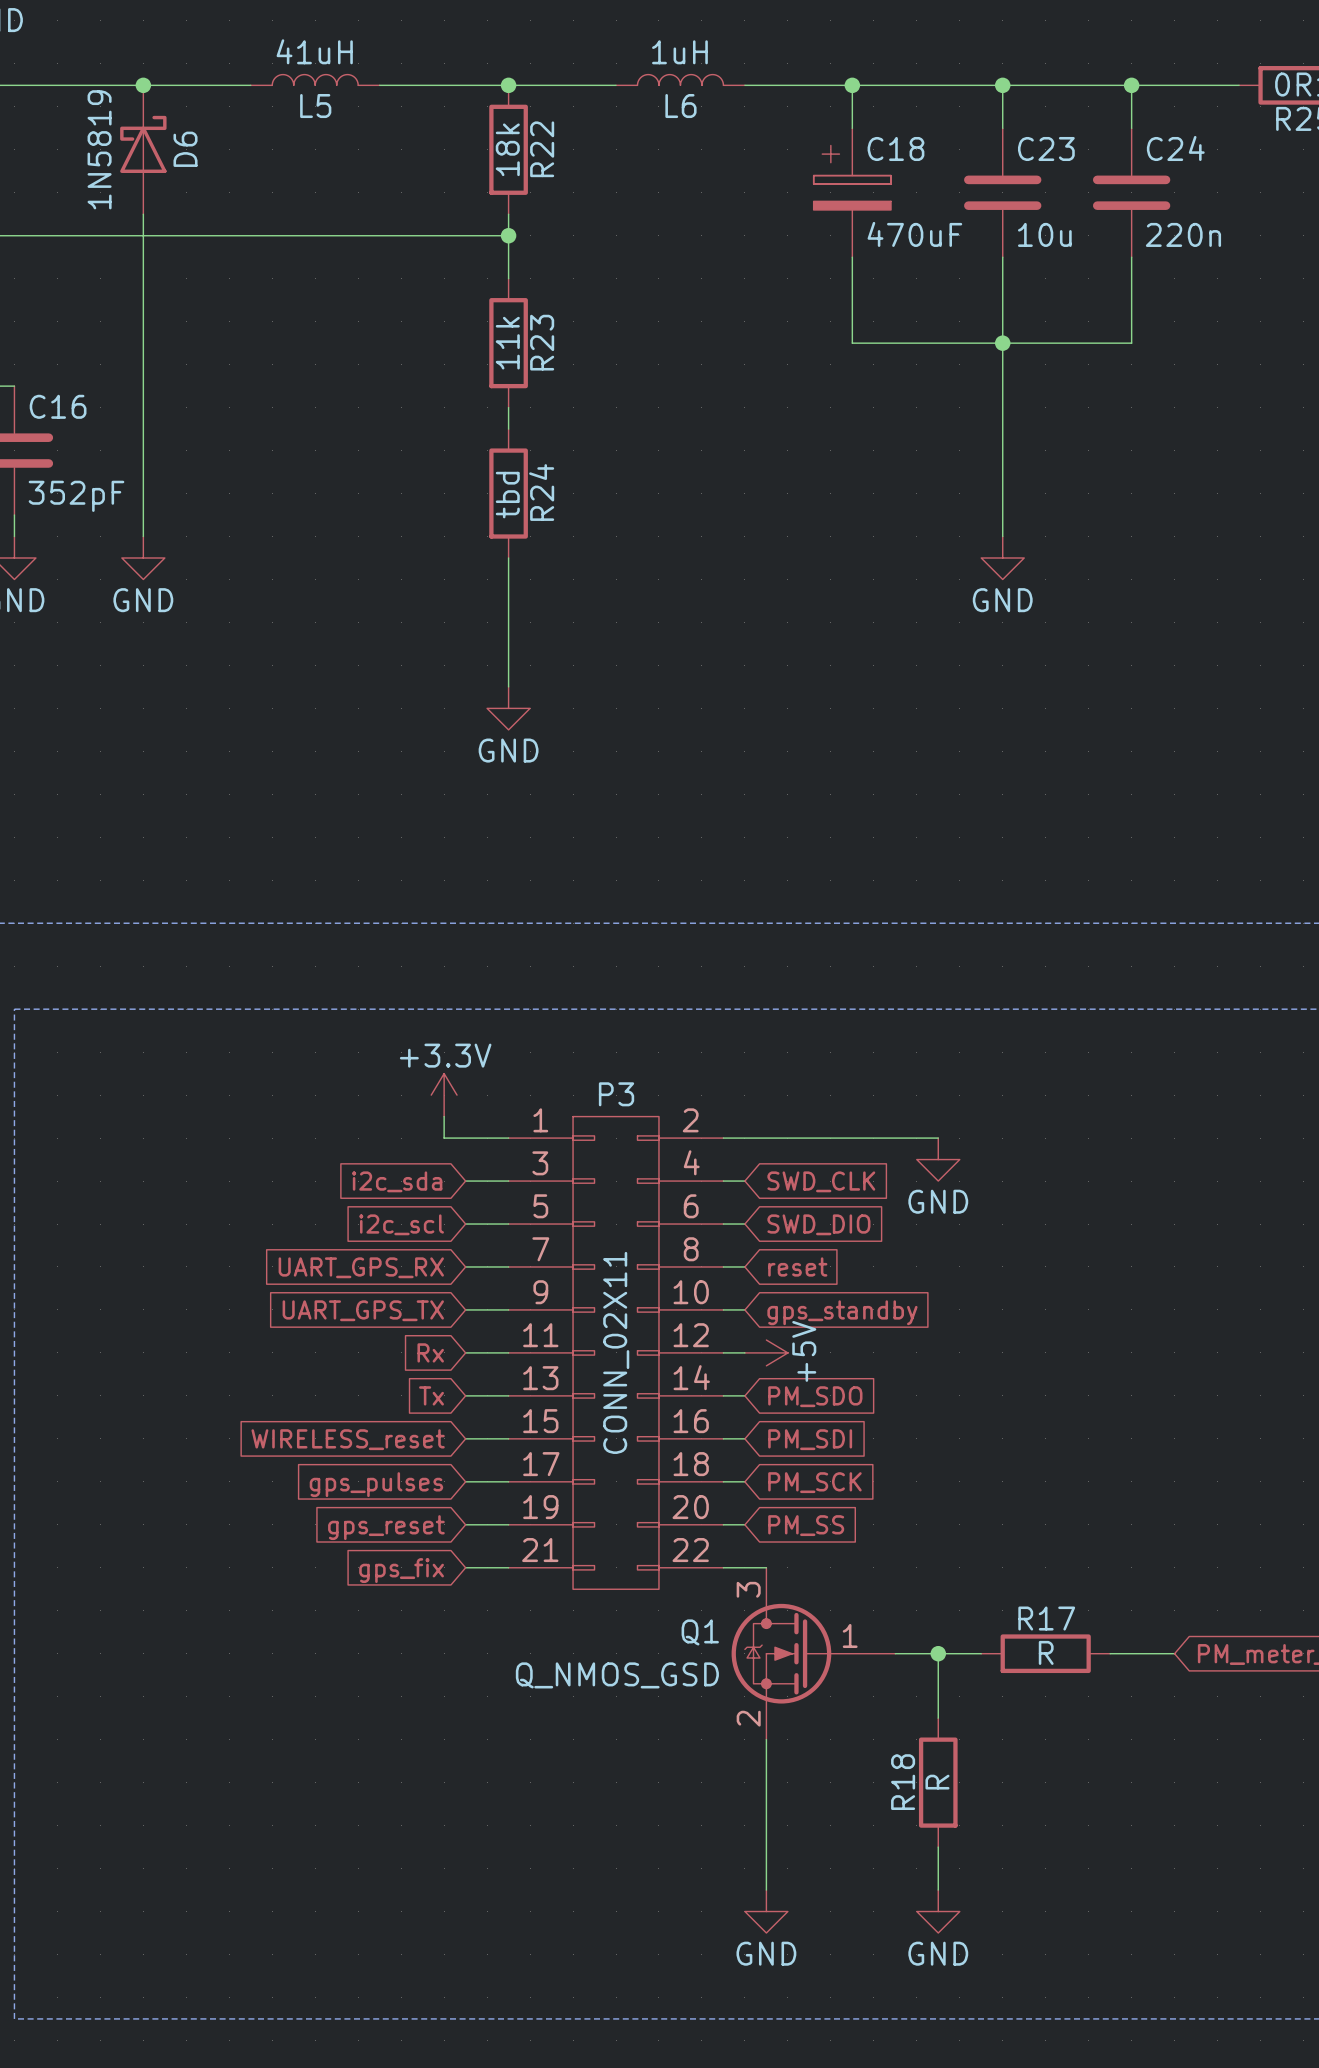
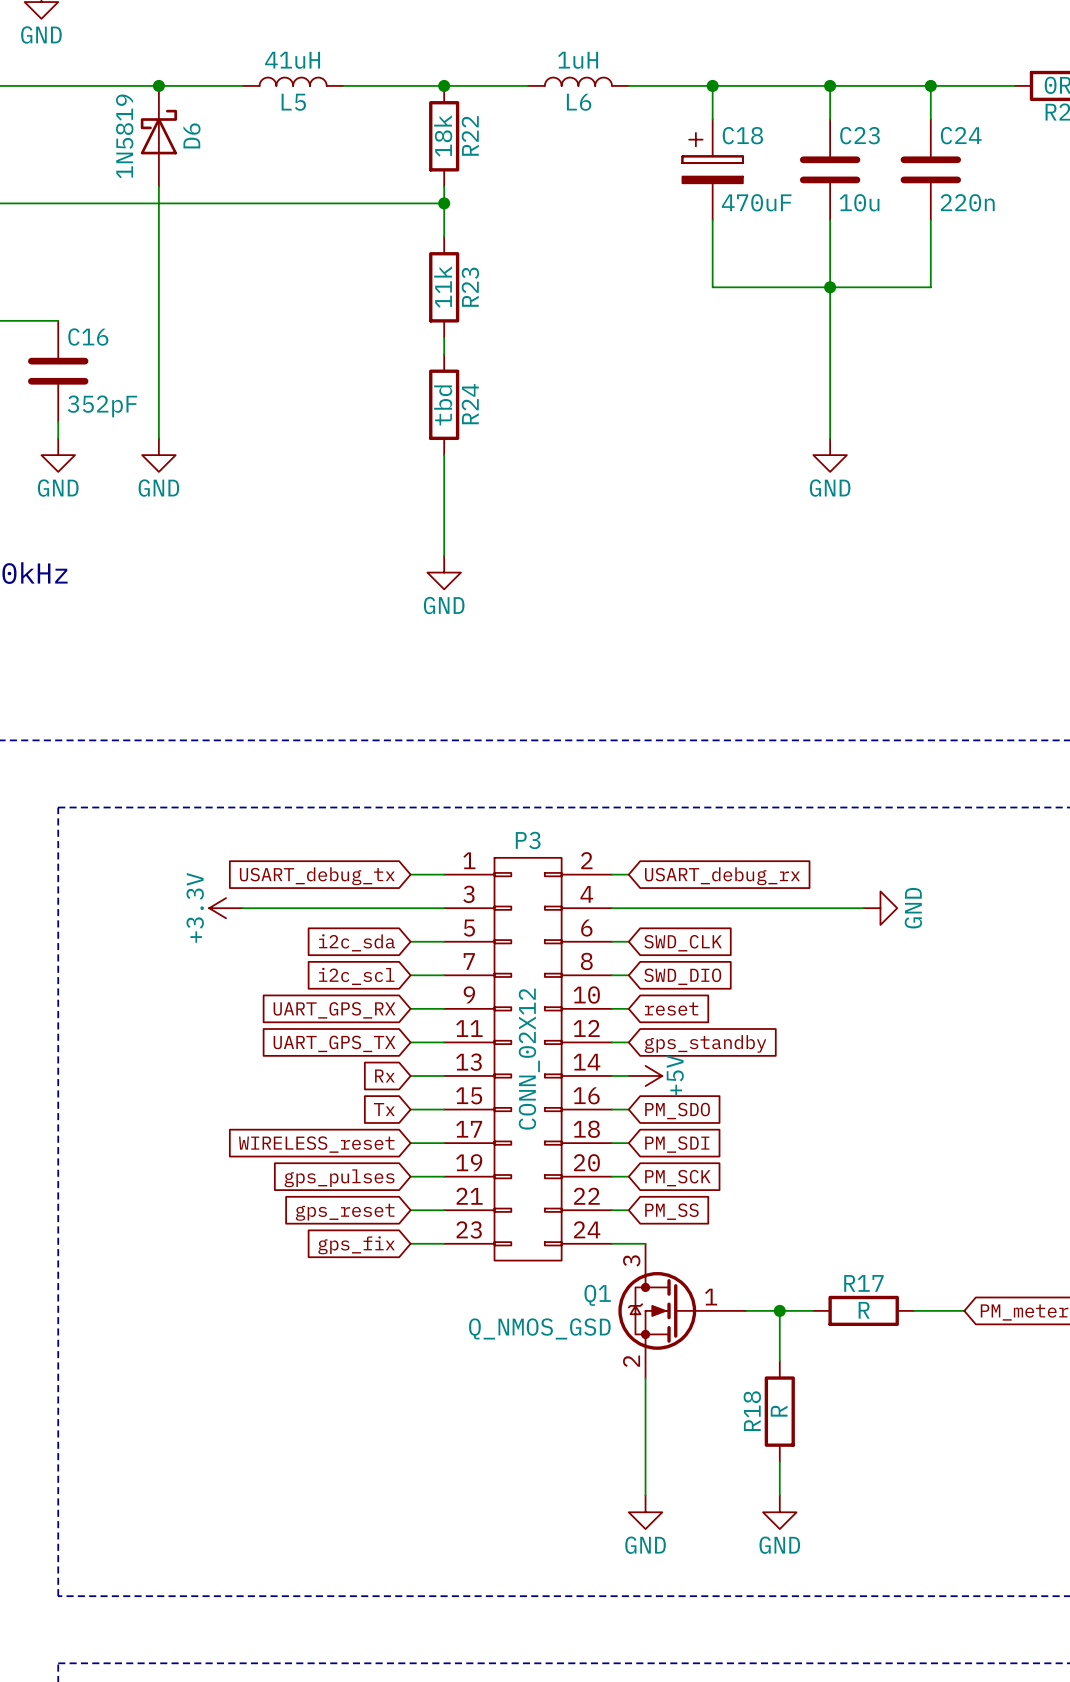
power symbol rotation: 0° (444, 1095) -> 90° counterclockwise (226, 908)
power symbol position: +3.3V (444, 1095) -> +3.3V (226, 908)
wire: none -> (410, 874) (444, 874)
wire: none -> (611, 874) (628, 874)
global label: none -> USART_debug_tx (317, 876)
global label: none -> USART_debug_rx (722, 876)
wire: (444, 1116) (444, 1138) -> (242, 908) (393, 908)
P3 symbol: [508, 1116, 724, 1590] -> [444, 857, 612, 1261]
wire: none -> (779, 908) (863, 908)
power symbol rotation: 0° (938, 1159) -> 90° counterclockwise (880, 908)
power symbol position: GND (938, 1159) -> GND (880, 908)
P3 value: CONN_02X11 (616, 1352) -> CONN_02X12 (529, 1059)

